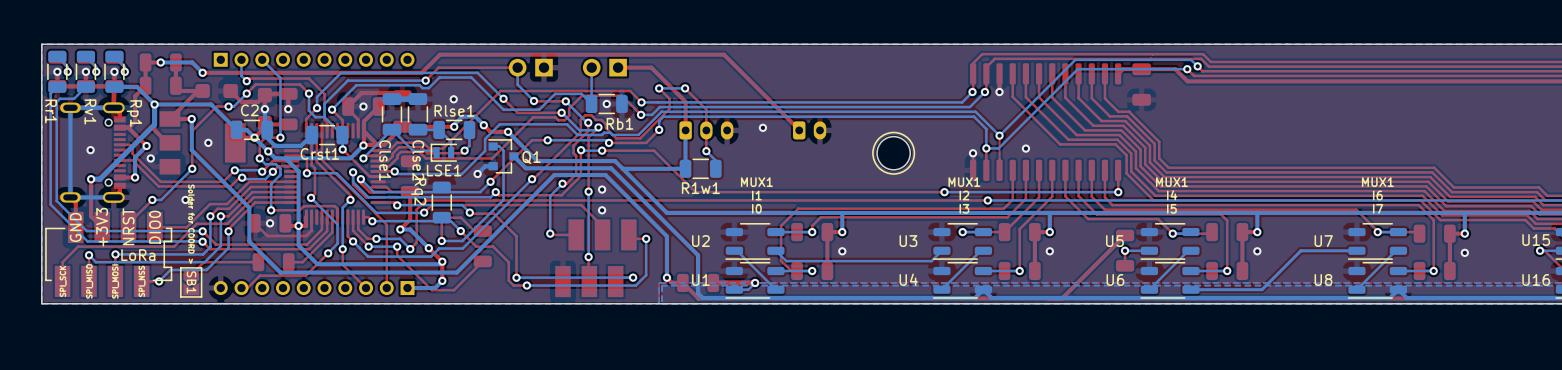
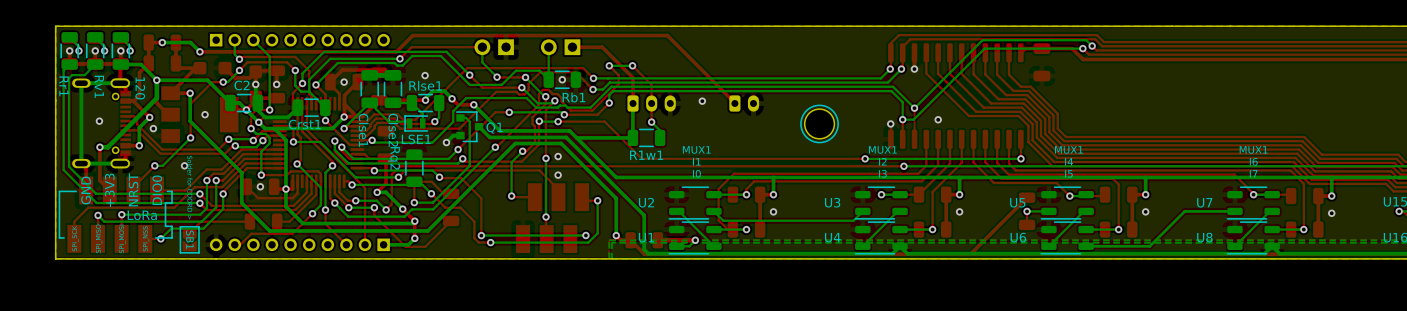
part value: Rp1 (134, 113) -> 120 (140, 88)

